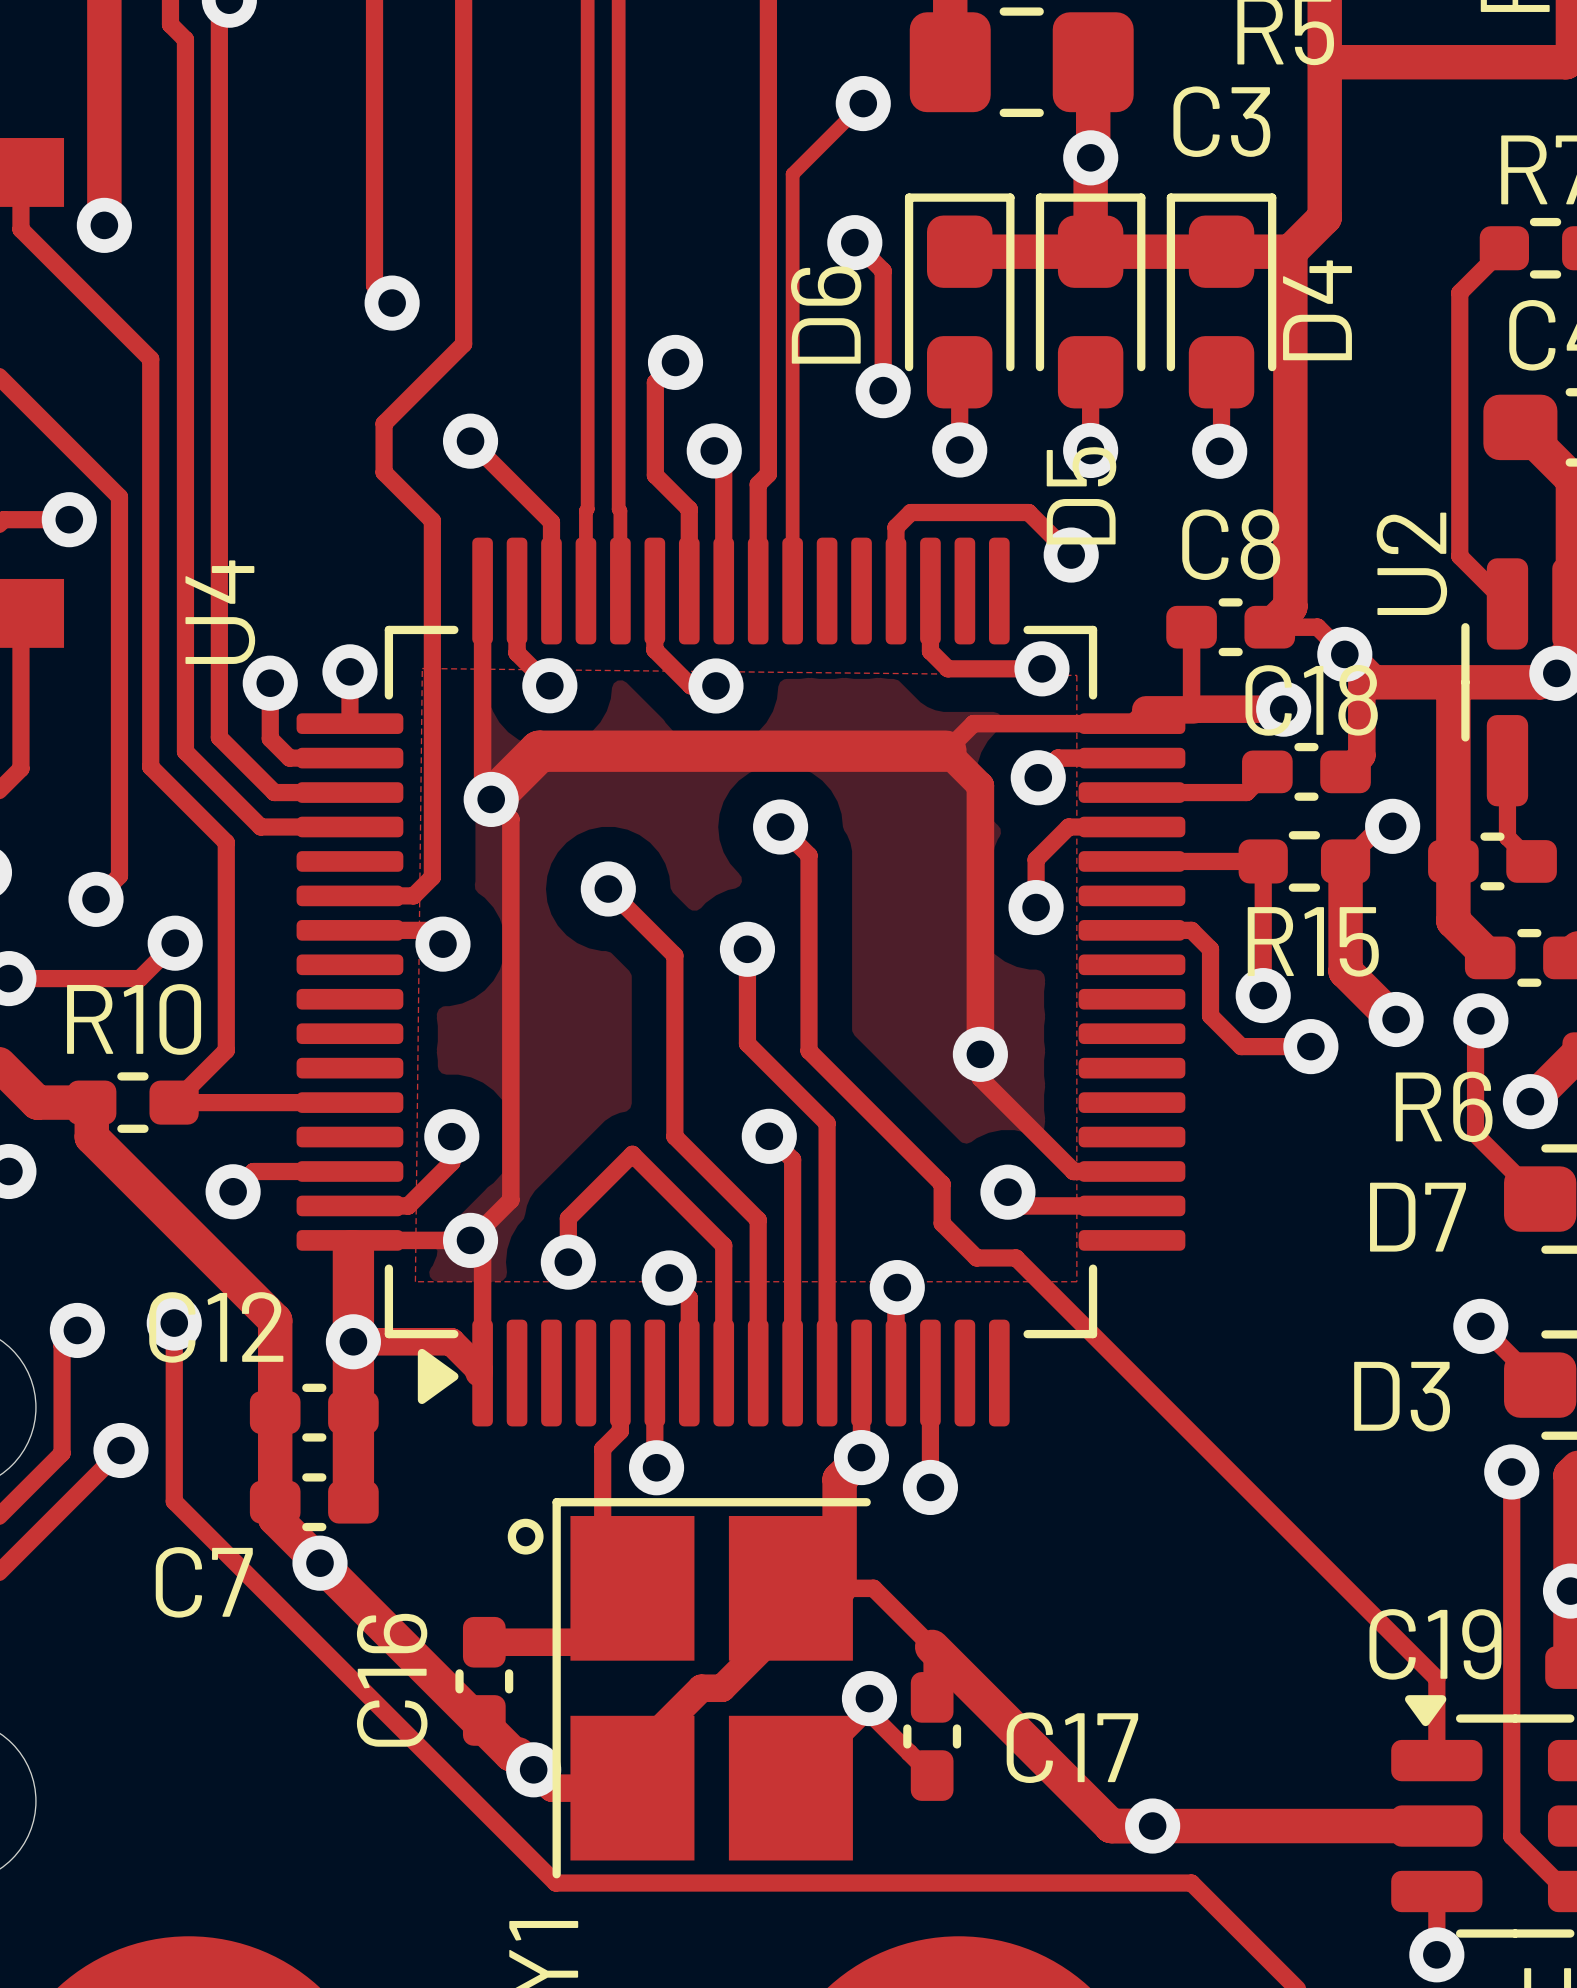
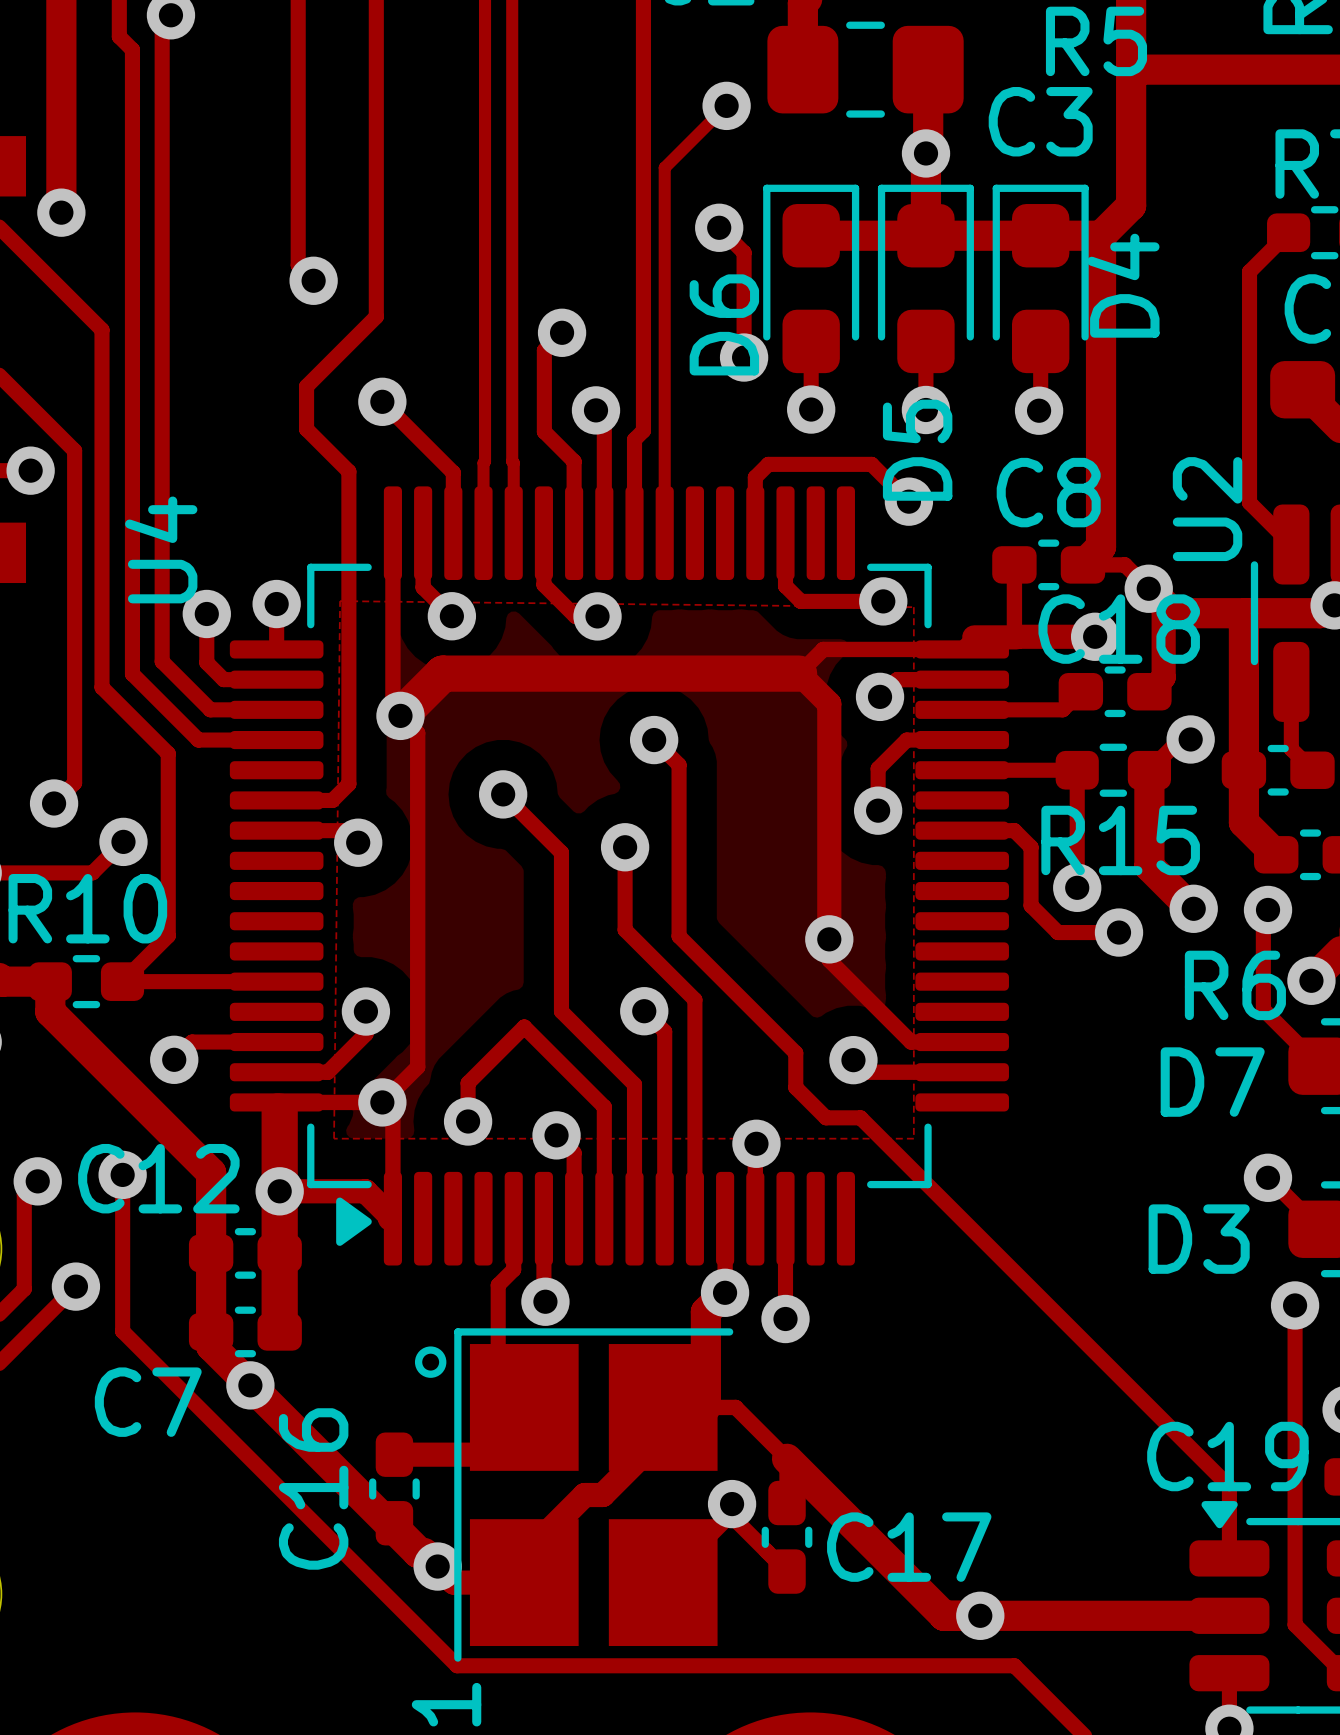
D6 name position: D6 (826, 314) -> D6 (724, 324)

